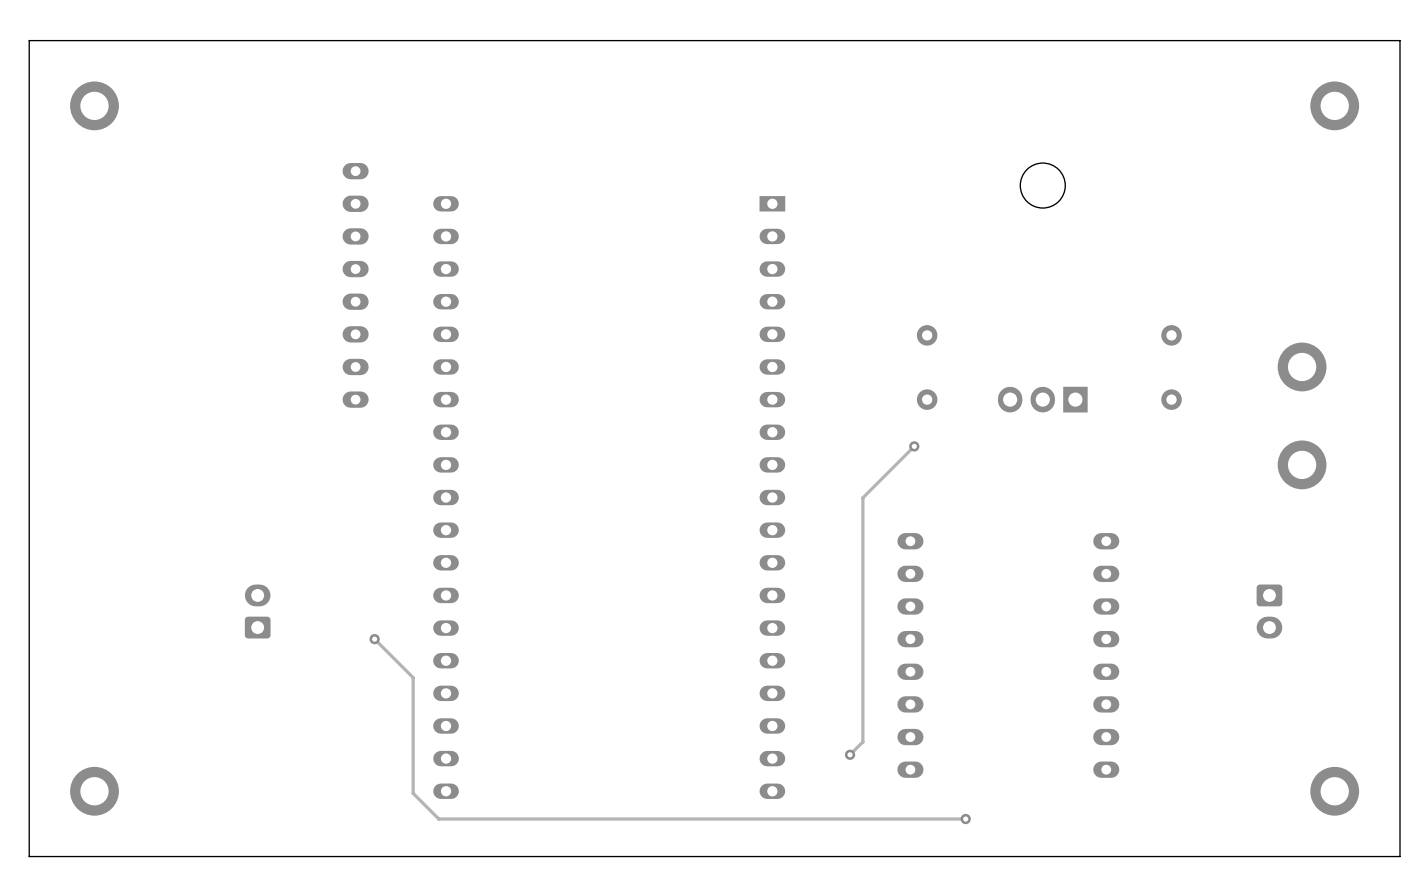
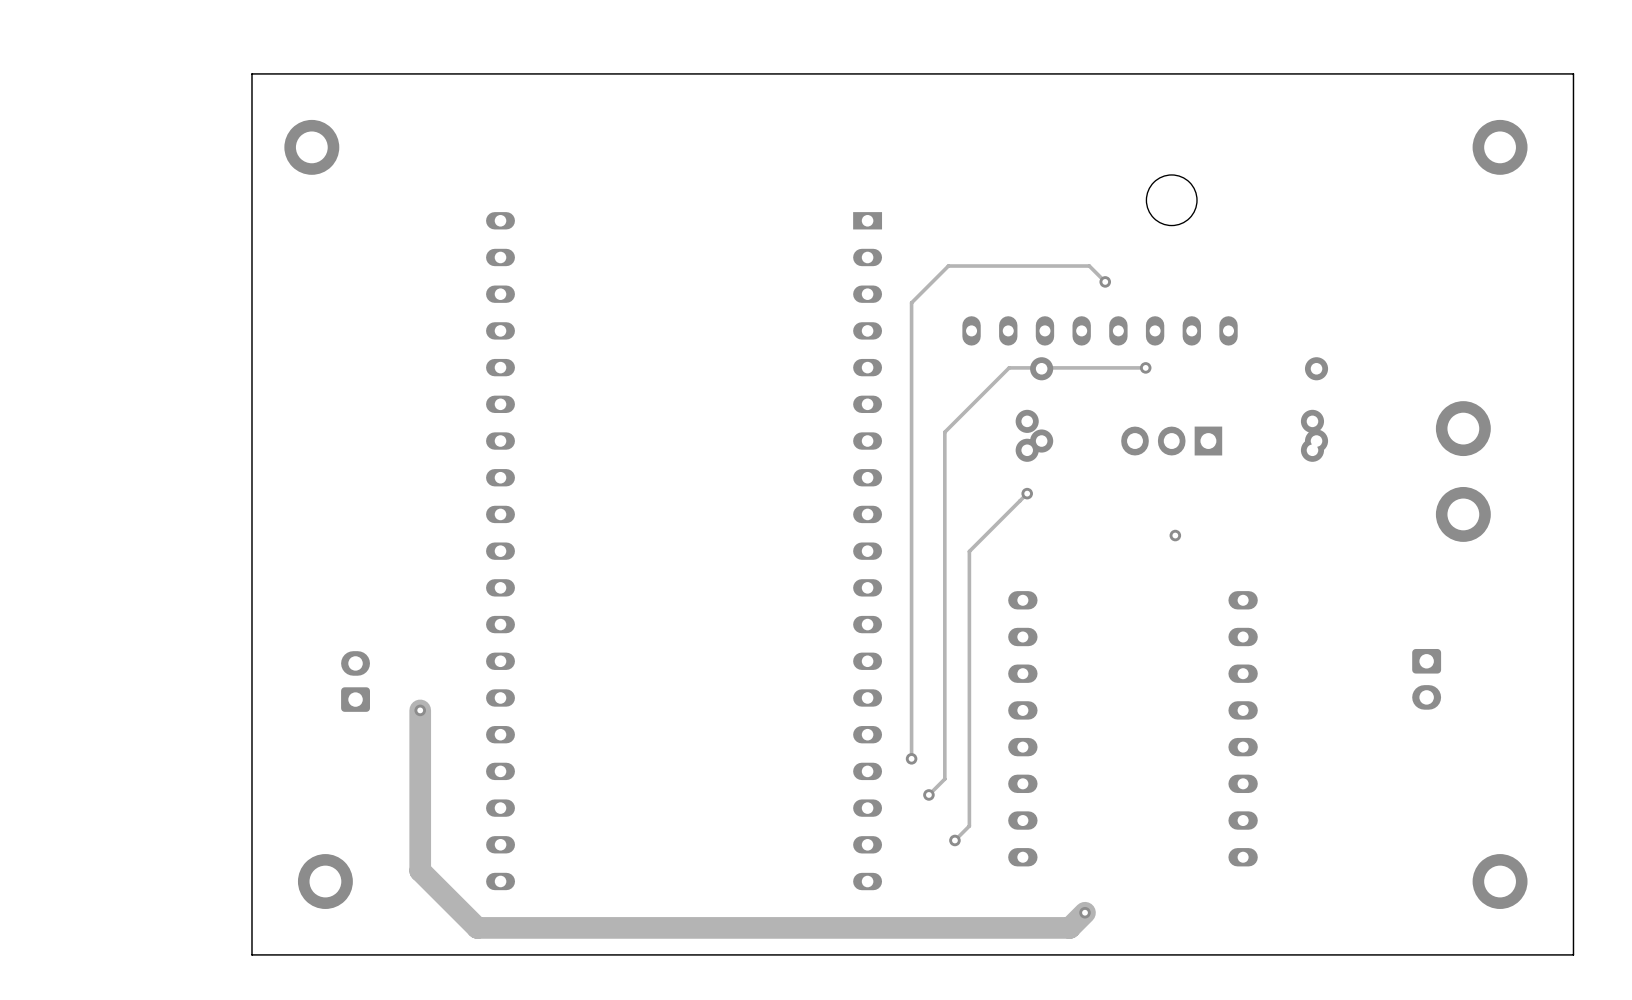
board edge: (1400, 73) (1400, 40) (29, 40) (29, 856) (225, 856) -> (1573, 73) (251, 73) (251, 954)
part position: (94, 105) -> (311, 147)
part position: (1334, 105) -> (1500, 147)
track: none -> (1105, 281) (1089, 266) (948, 266) (911, 302) (911, 758)
via: none -> (1105, 281)
part: (355, 285) -> none
part: none -> (1100, 330)
track: none -> (1145, 367) (1009, 367) (944, 432) (944, 779) (928, 794)
via: none -> (1145, 367)
part position: (1302, 366) -> (1463, 428)
part: none -> (1027, 435)
part: none -> (1312, 435)
via: none -> (1175, 535)
part position: (257, 611) -> (355, 681)
track: (374, 639) (413, 677) (413, 793) (438, 819) (965, 819) -> (420, 710) (420, 870) (477, 927) (1069, 927) (1085, 912)
via: none -> (911, 758)
via: none -> (928, 794)
part position: (94, 791) -> (325, 881)

